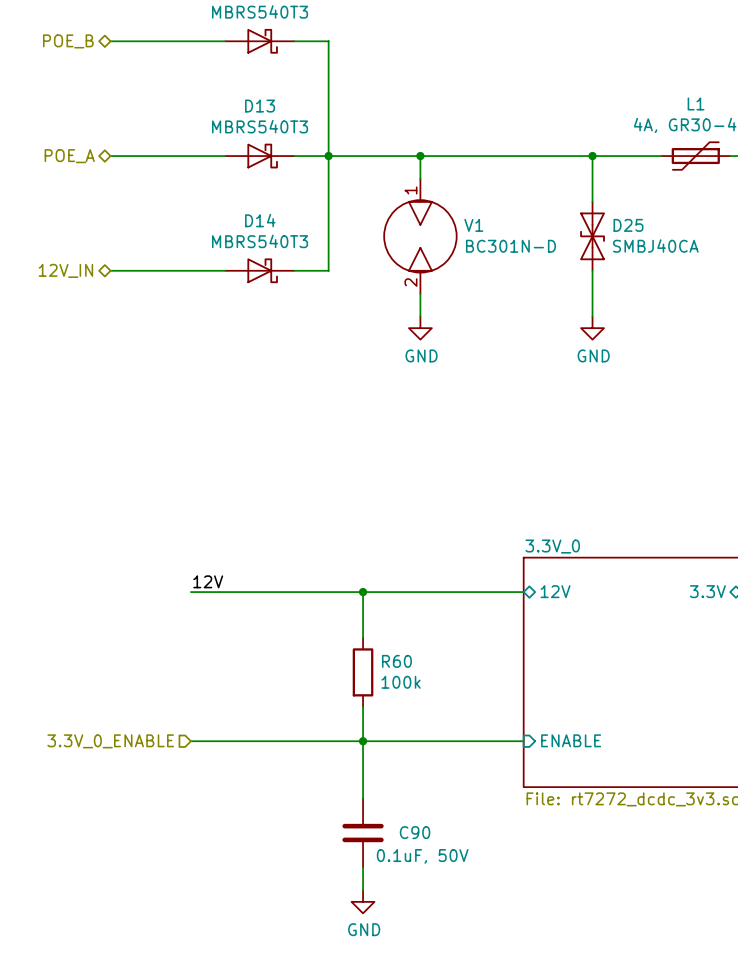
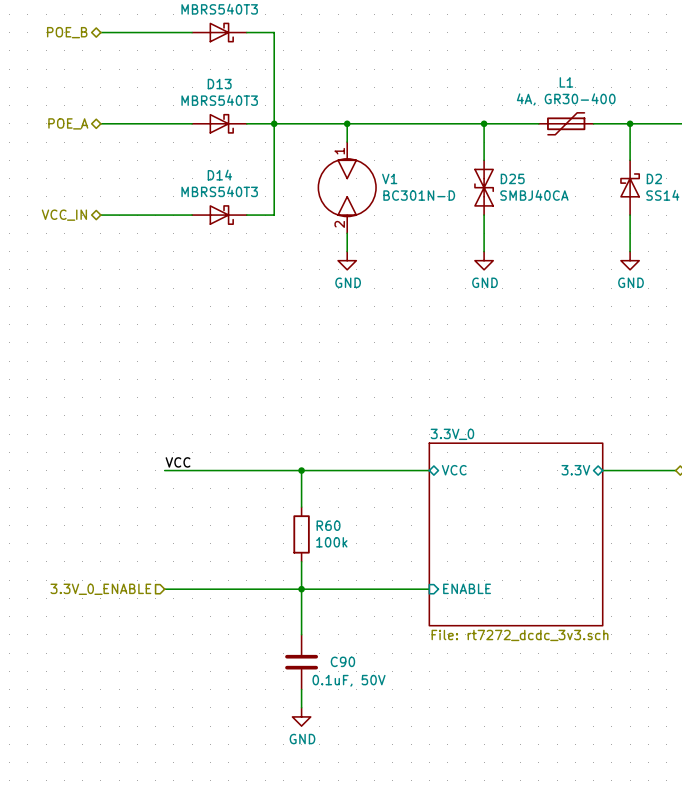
hierarchical label: 12V_IN (65, 270) -> VCC_IN (64, 215)
label: 12V (208, 581) -> VCC (178, 462)
sheet pin: 12V (555, 591) -> VCC (454, 470)

